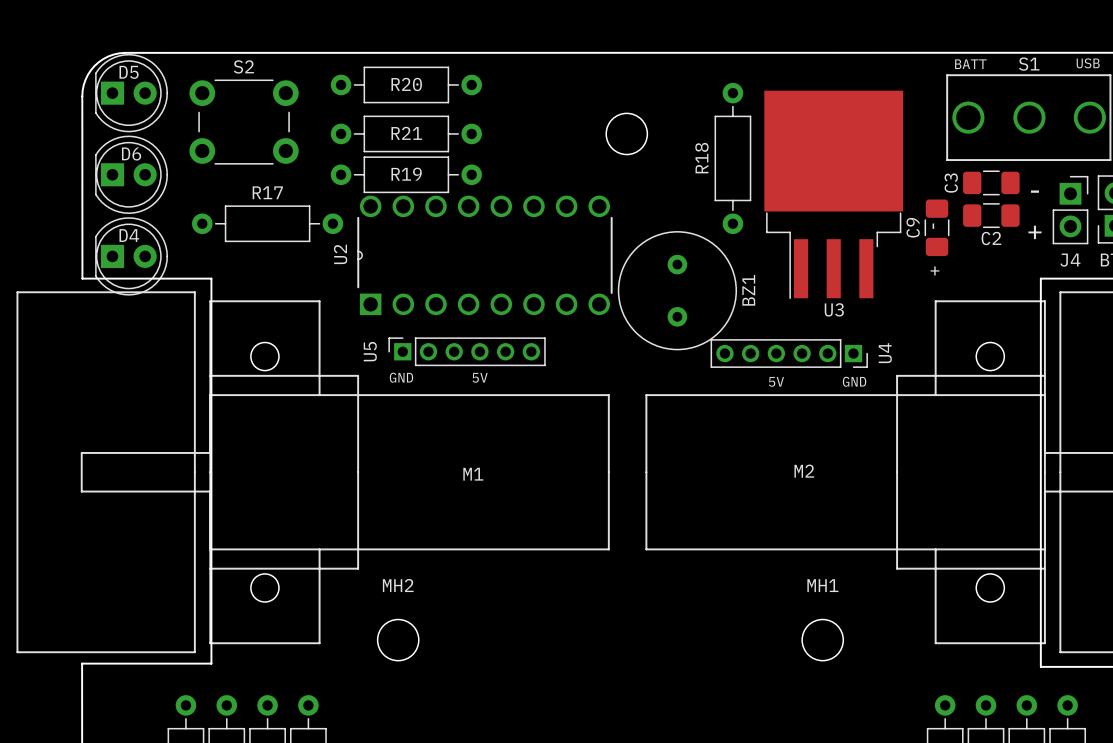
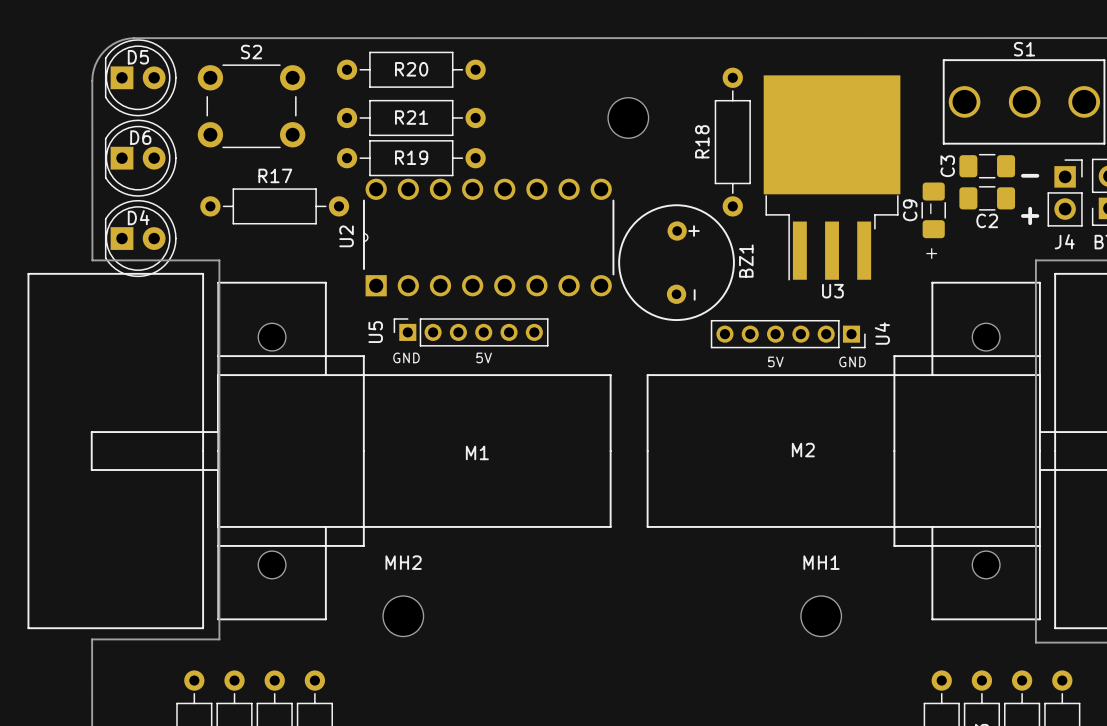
text: USB (1088, 63) -> none
text: BATT (970, 64) -> none
BZ1 footprint: [617, 231, 738, 351] -> [618, 204, 735, 322]

